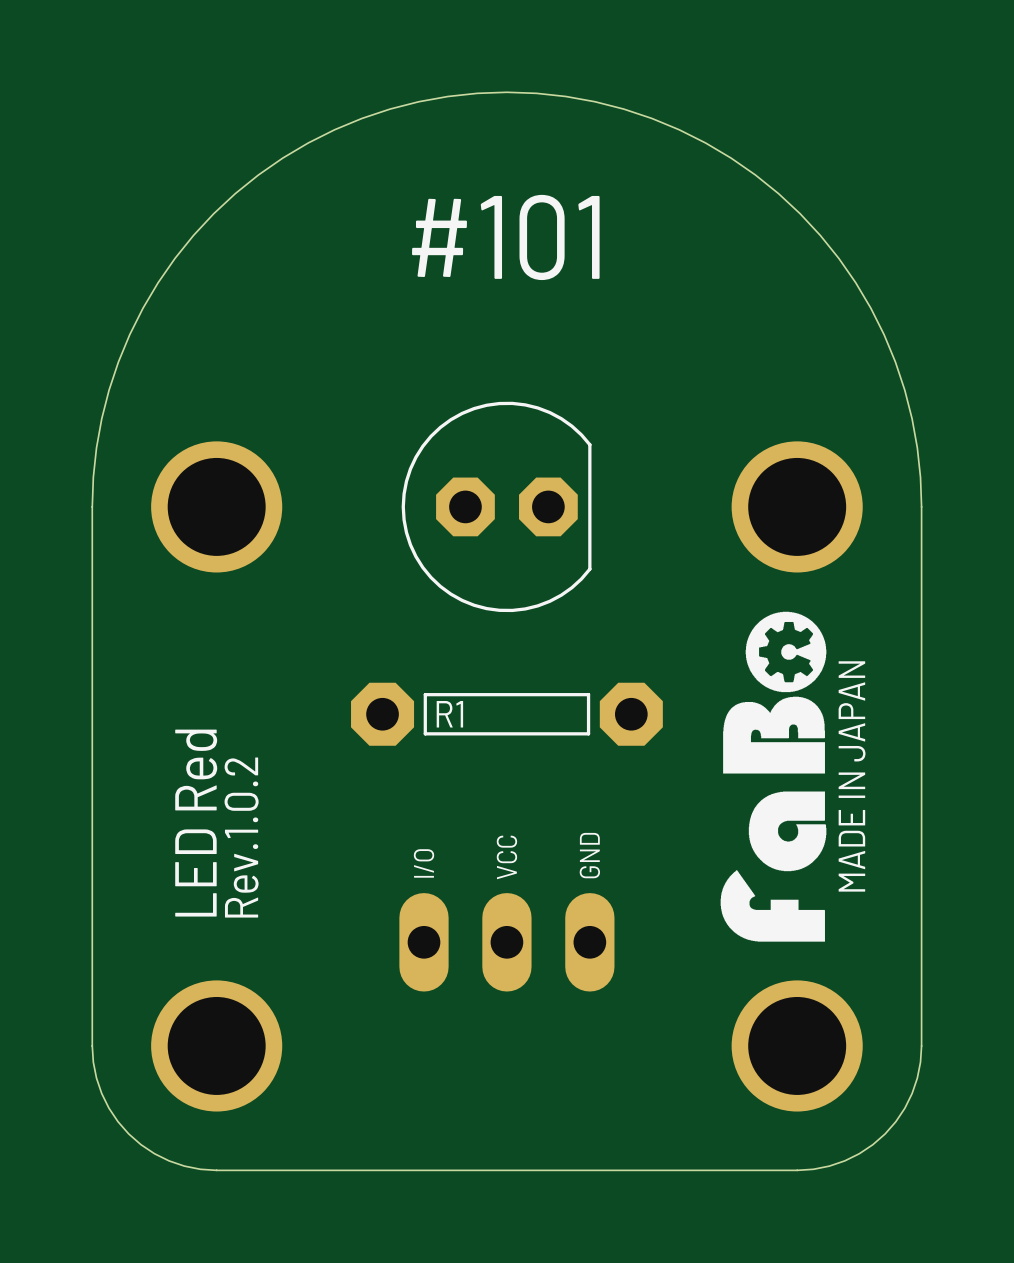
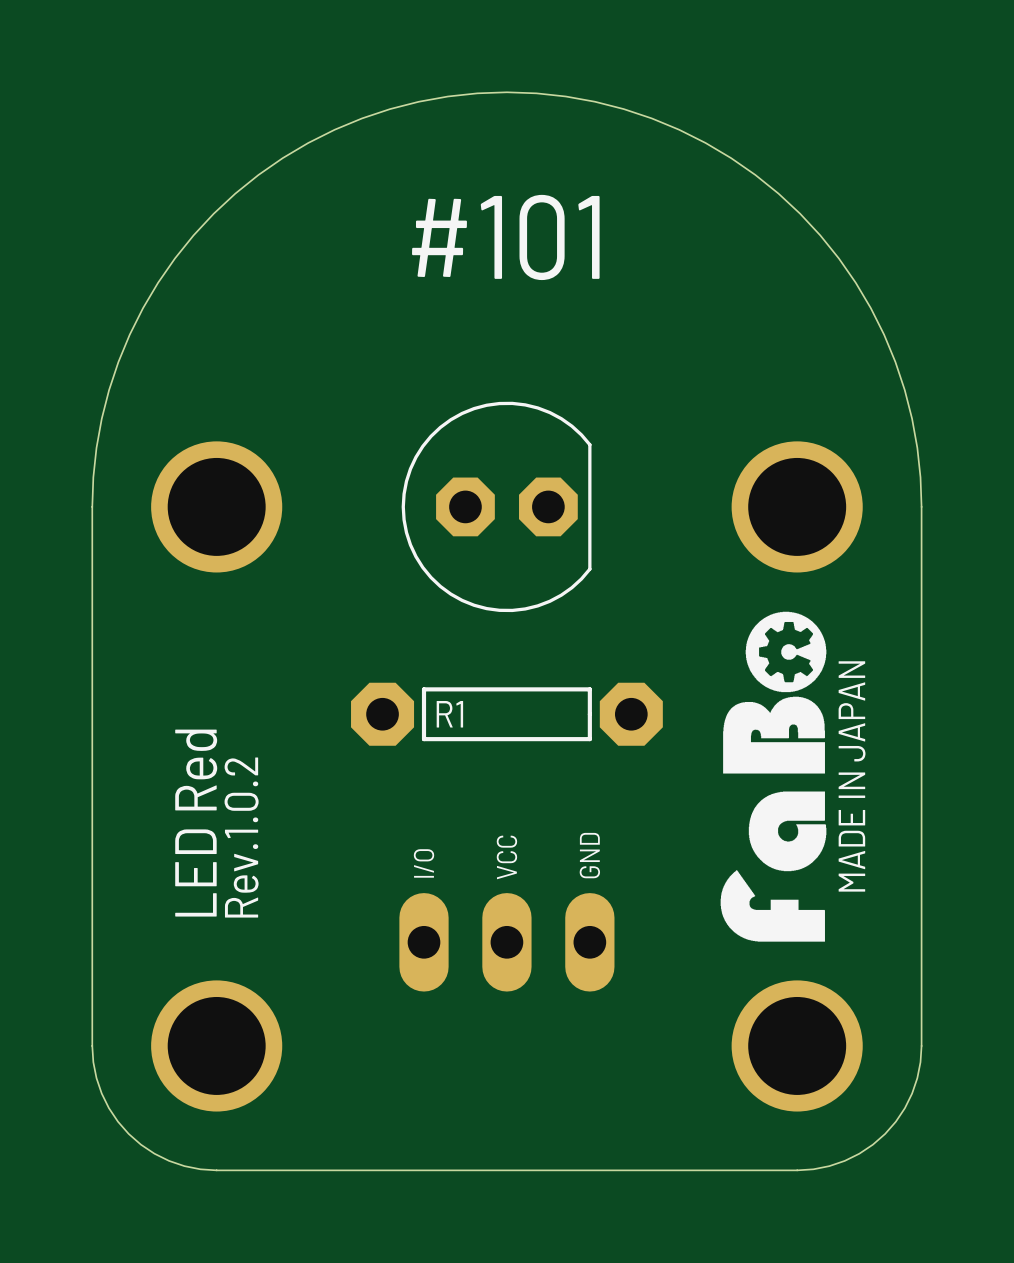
R1 footprint: [351, 682, 663, 746] -> [351, 682, 663, 746]

